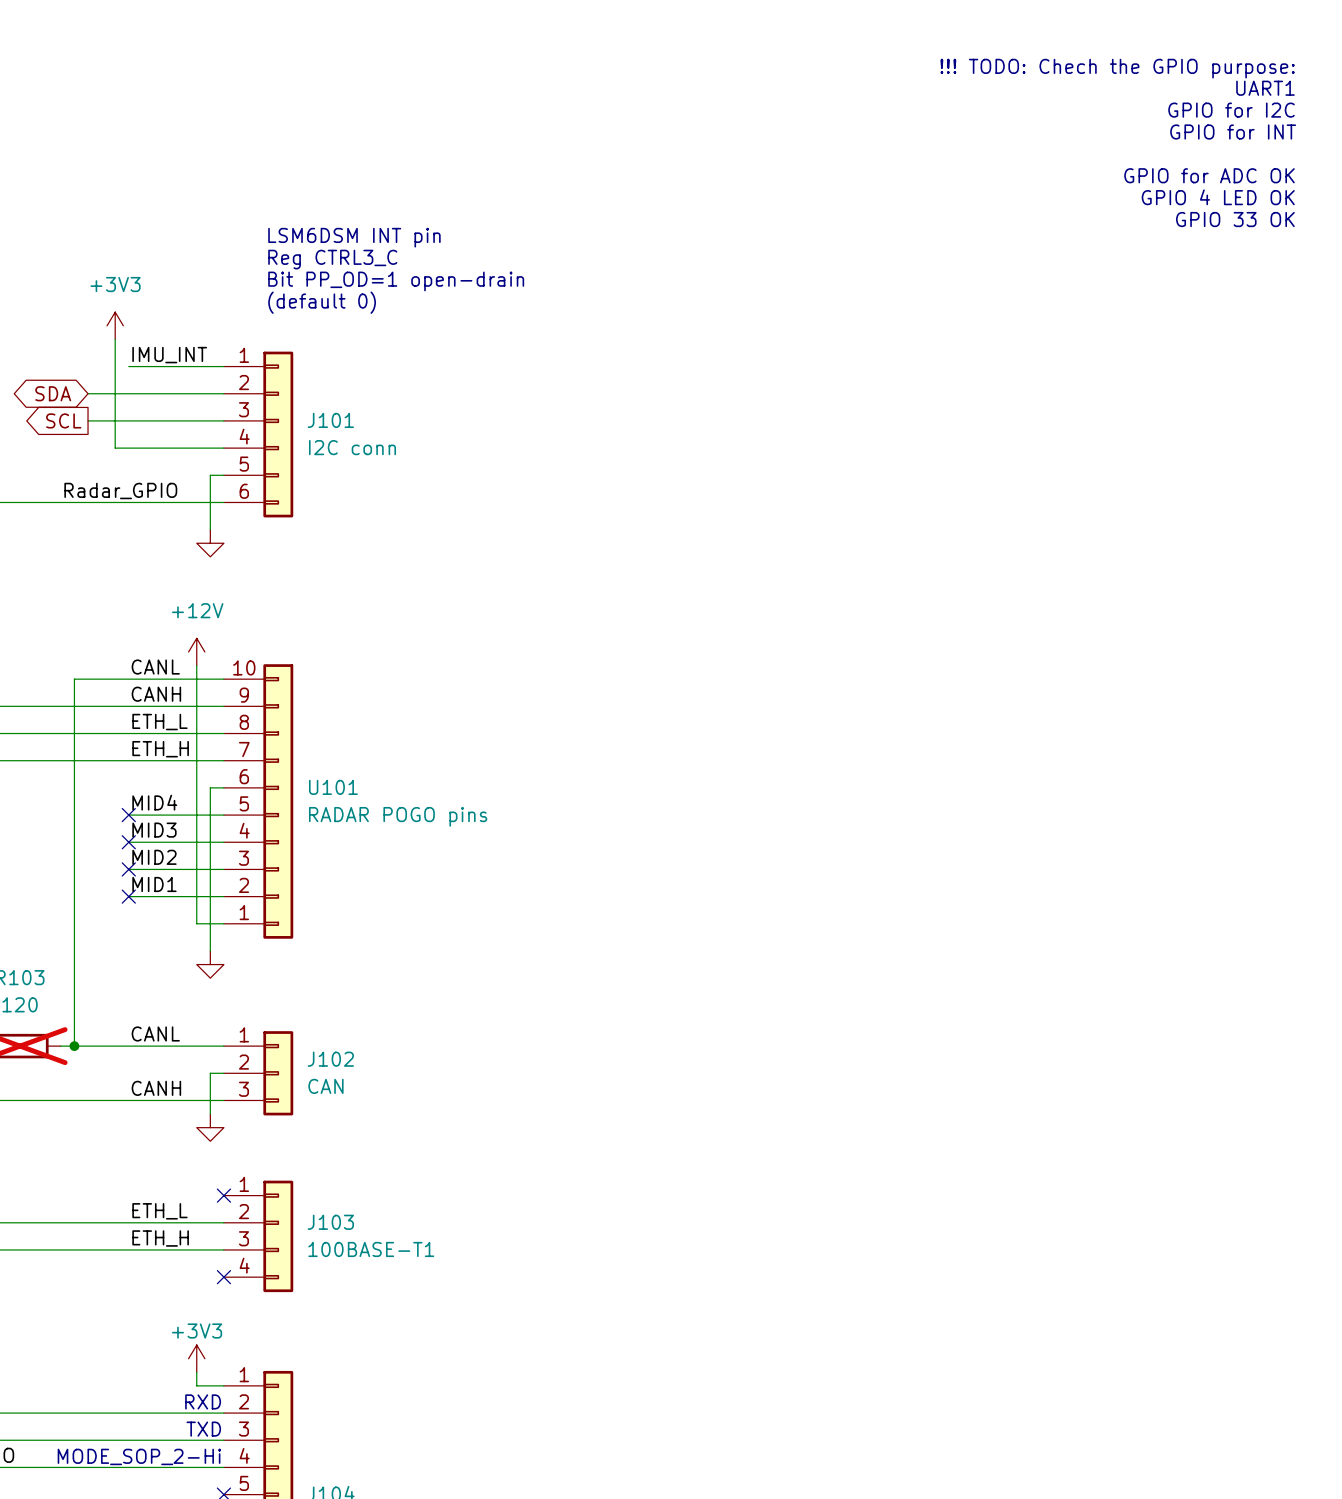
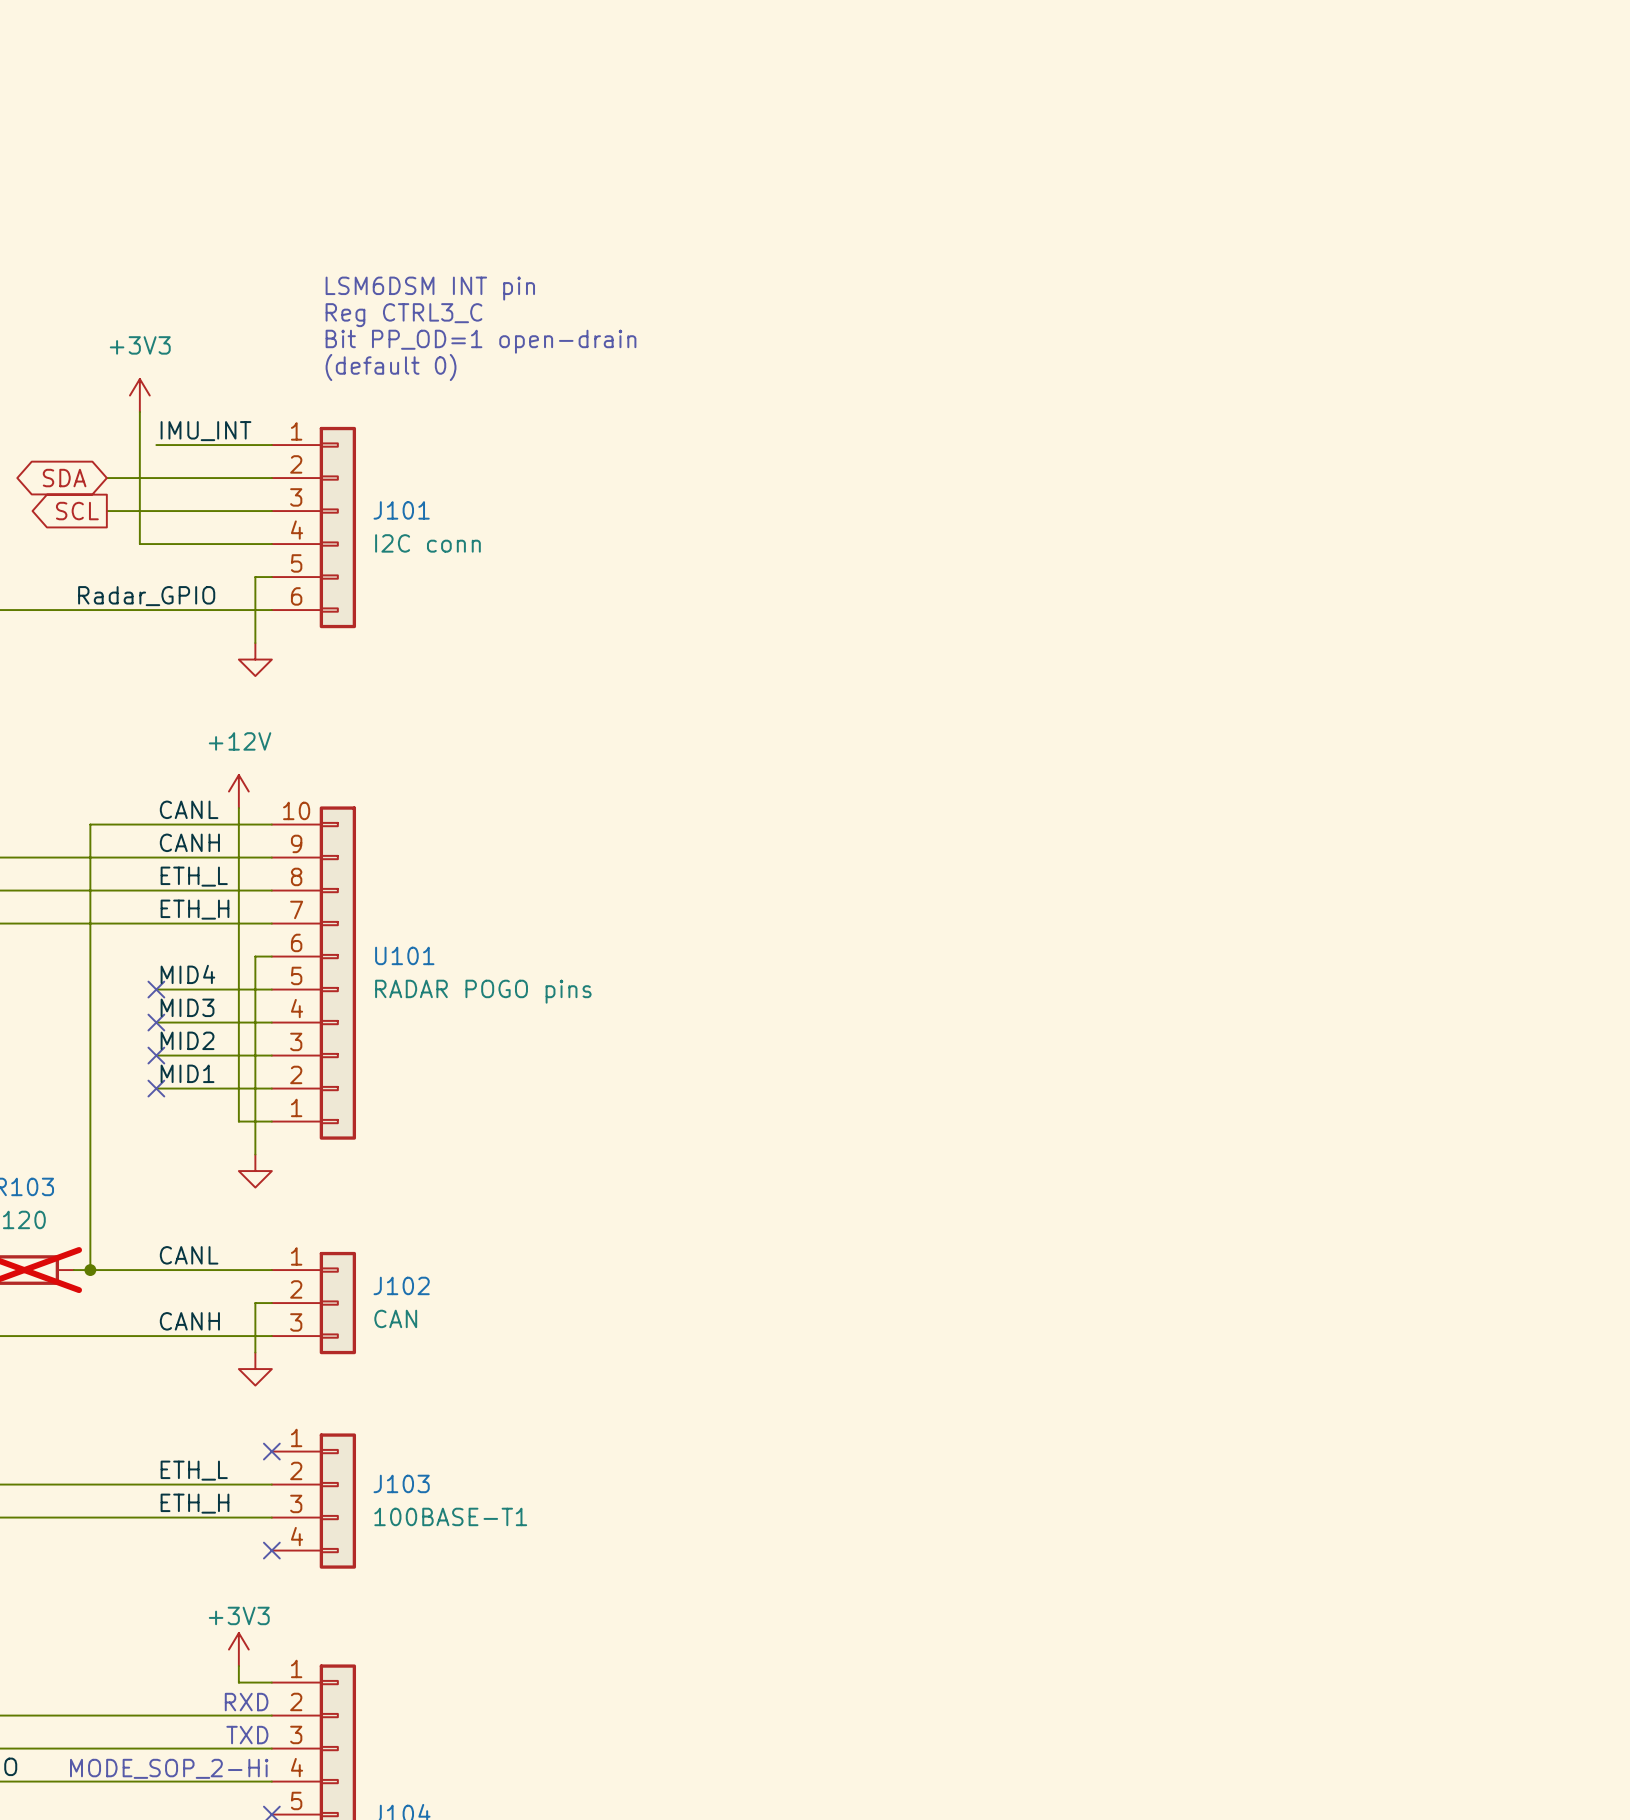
text: !!! TODO: Chech the GPIO purpose: (1117, 68) -> none
text: UART1 (1265, 88) -> none
text: GPIO for I2C (1231, 110) -> none
text: GPIO for INT (1233, 132) -> none
text: GPIO for ADC OK (1209, 175) -> none
text: GPIO 4 LED OK (1218, 197) -> none
text: GPIO 33 OK (1235, 219) -> none

